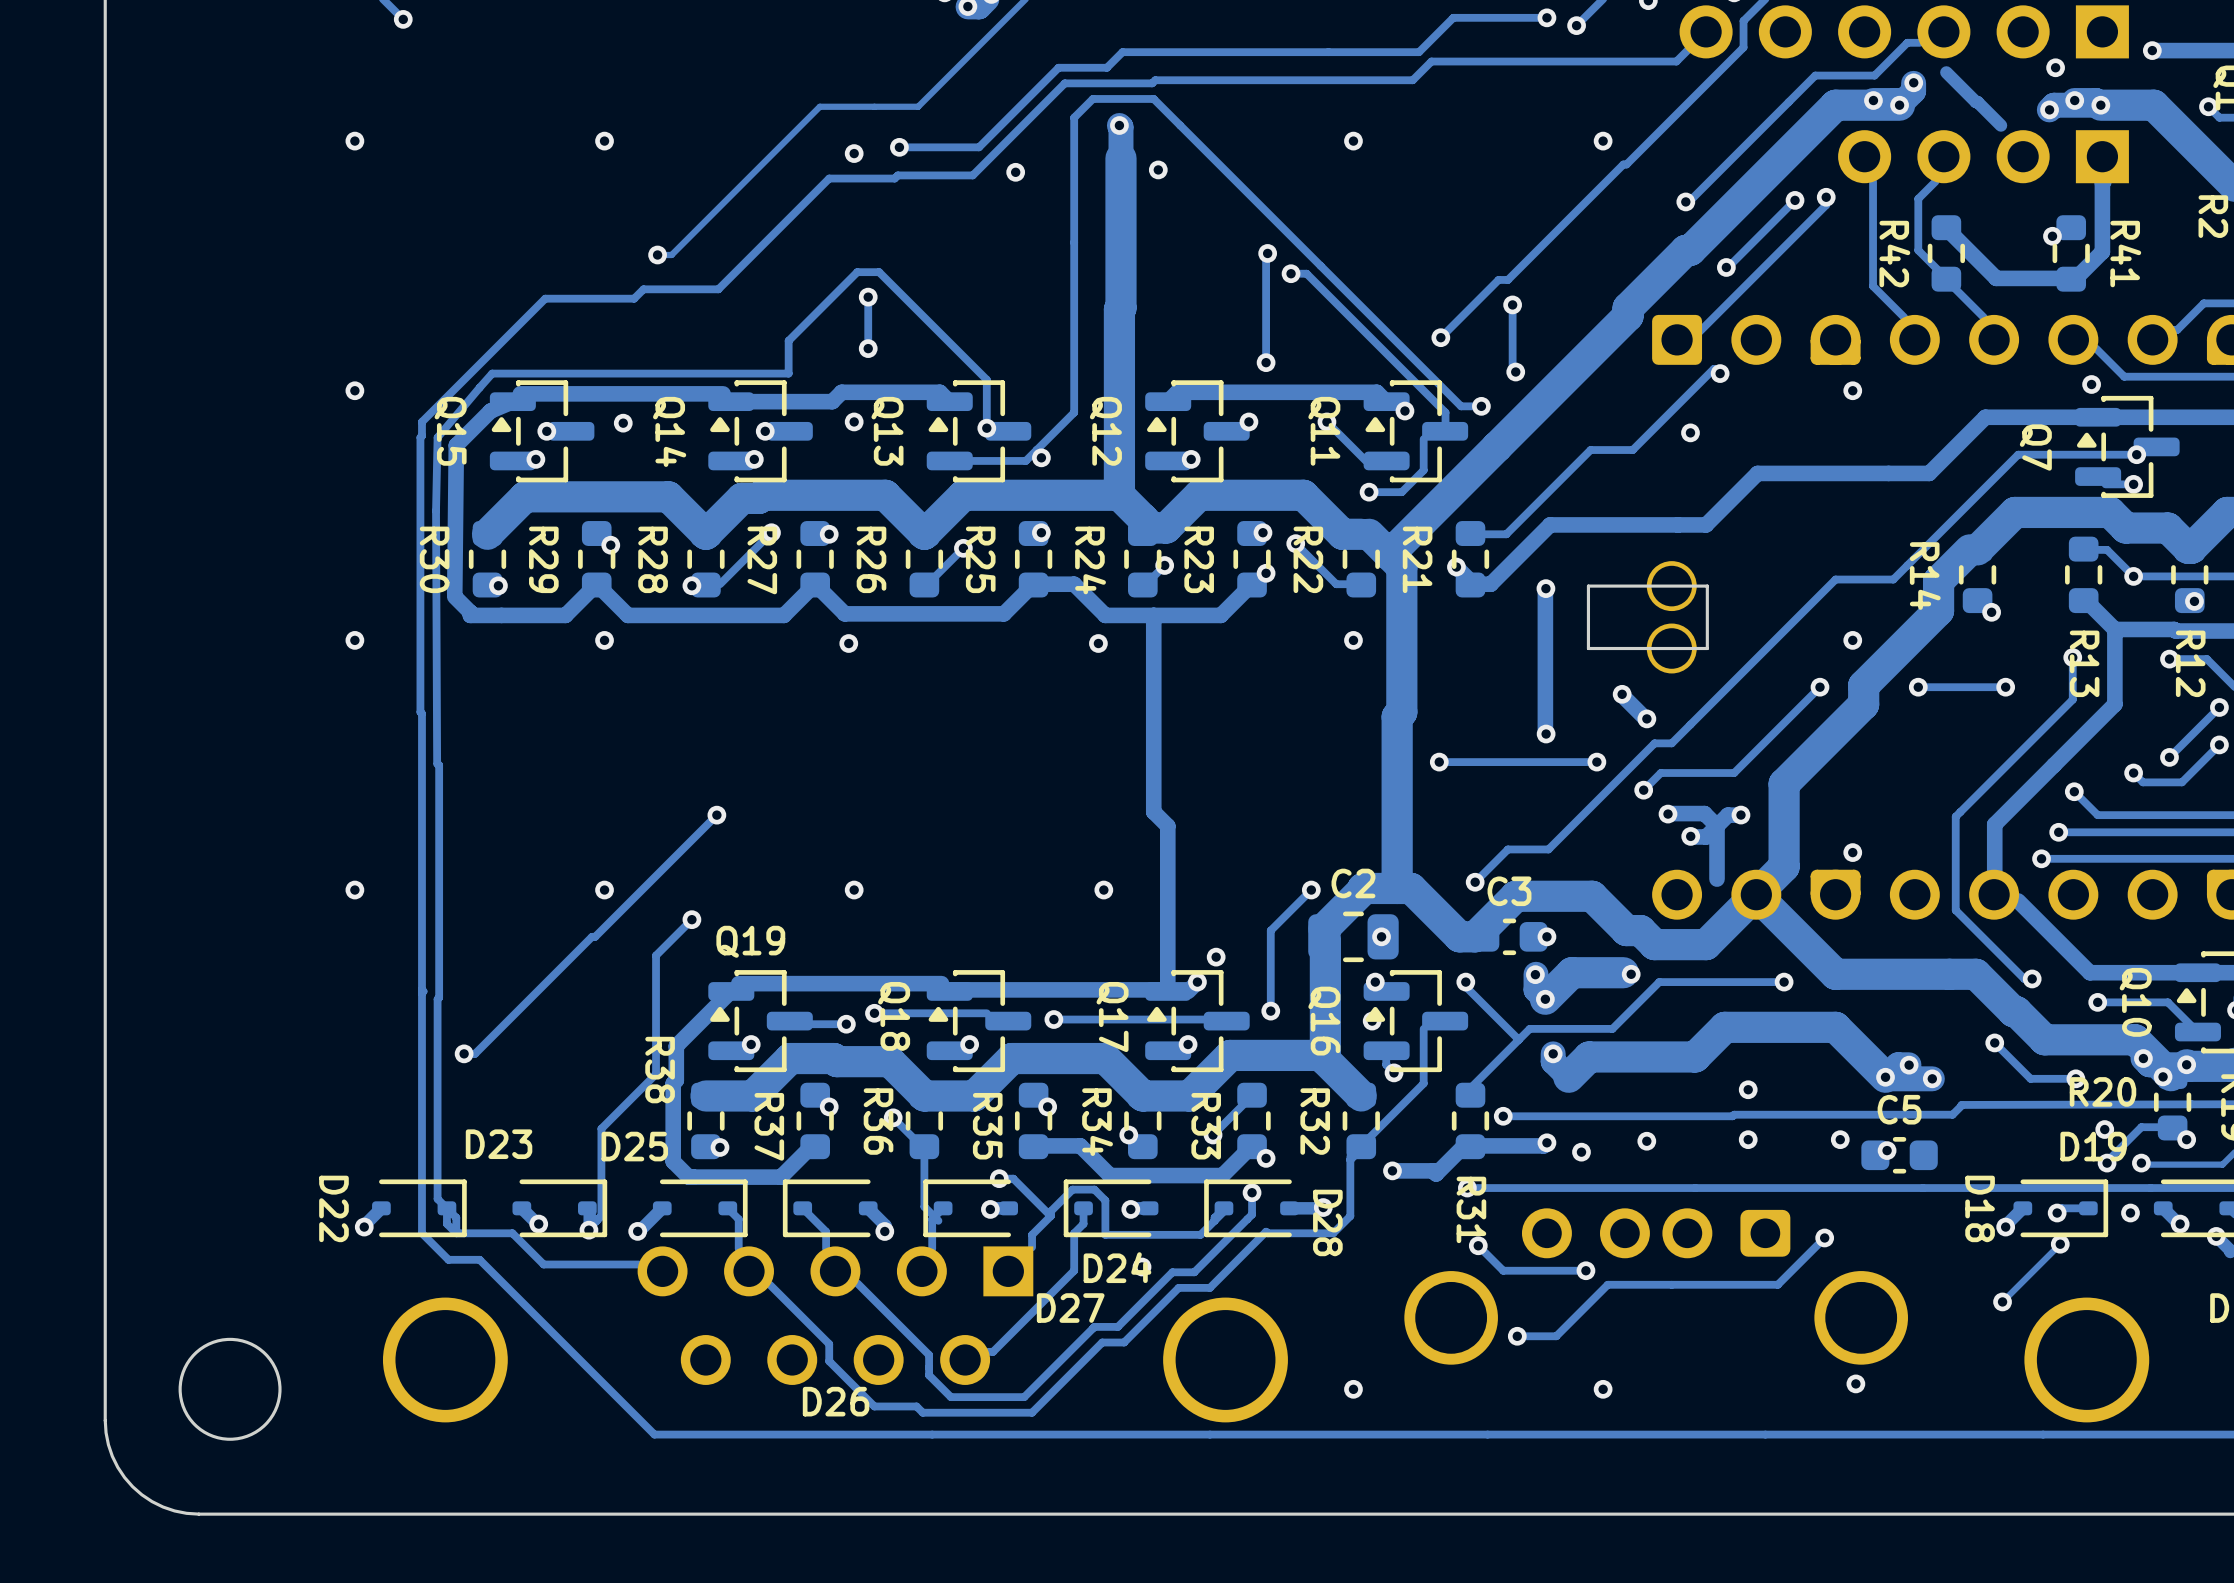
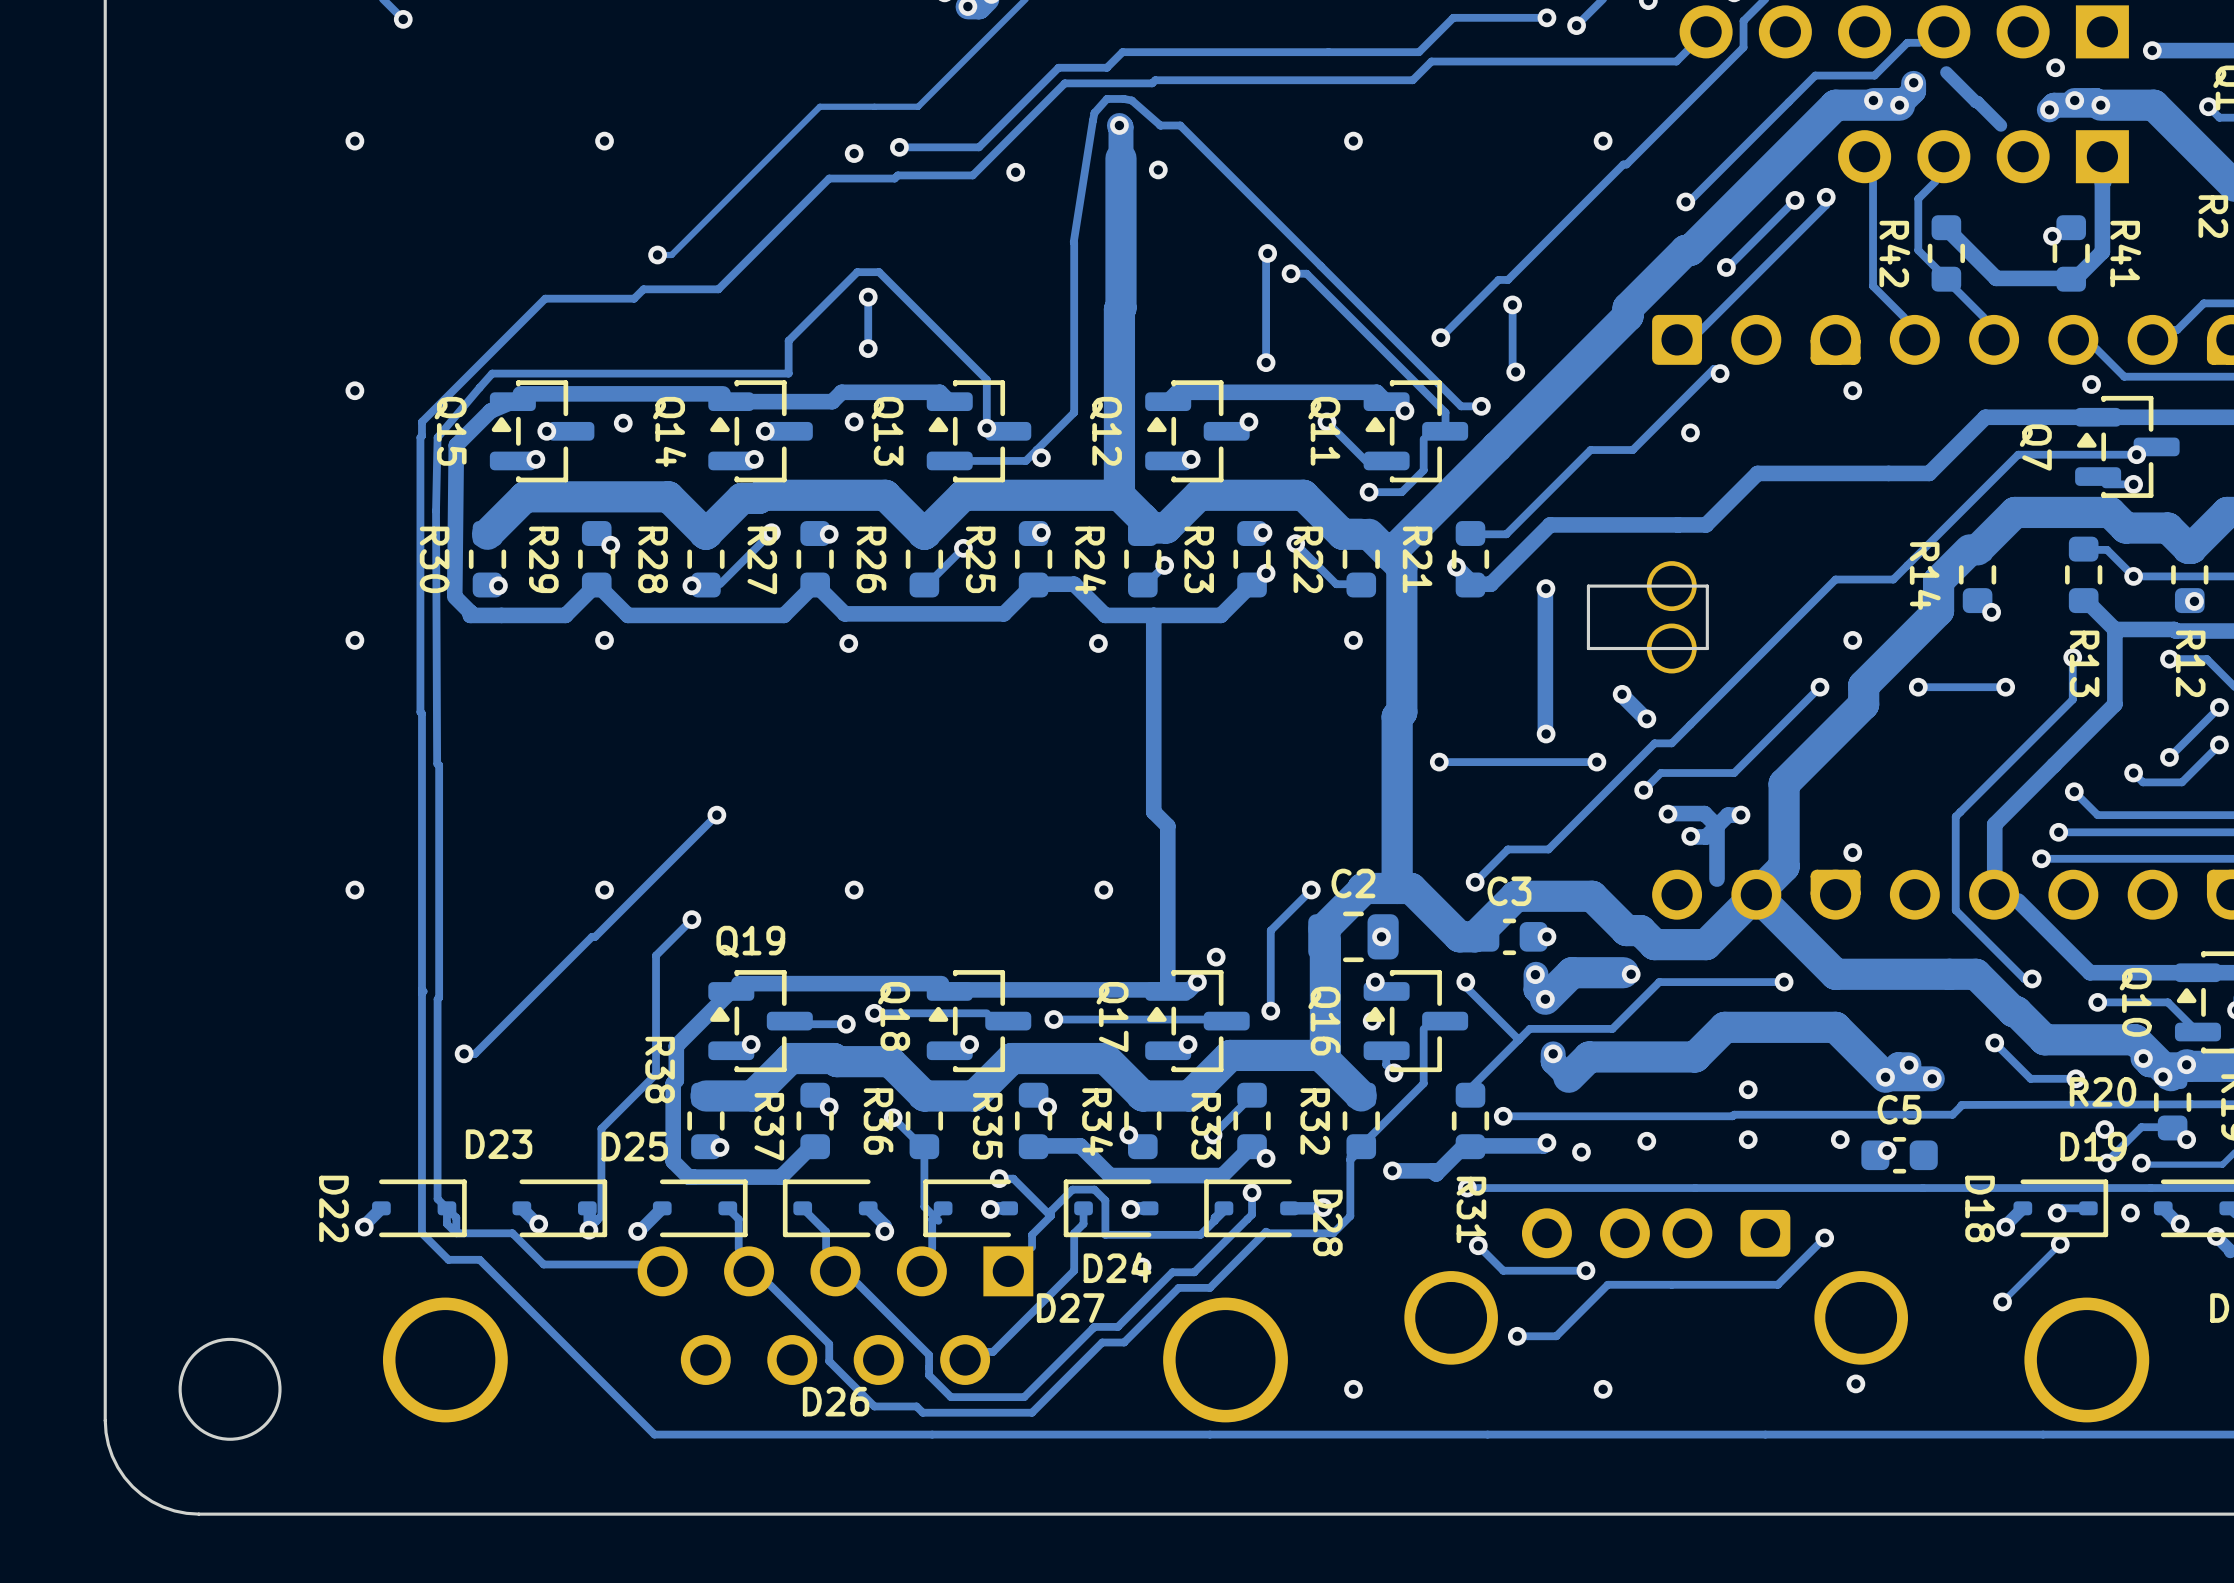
track: (1106, 98) (1092, 98) (1074, 117) (1074, 242) -> (1106, 98) (1094, 113) (1073, 242)
track: (1124, 98) (1153, 98) (1180, 125) -> (1124, 98) (1131, 100) (1160, 125)
track: none -> (1180, 125) (1159, 125)

